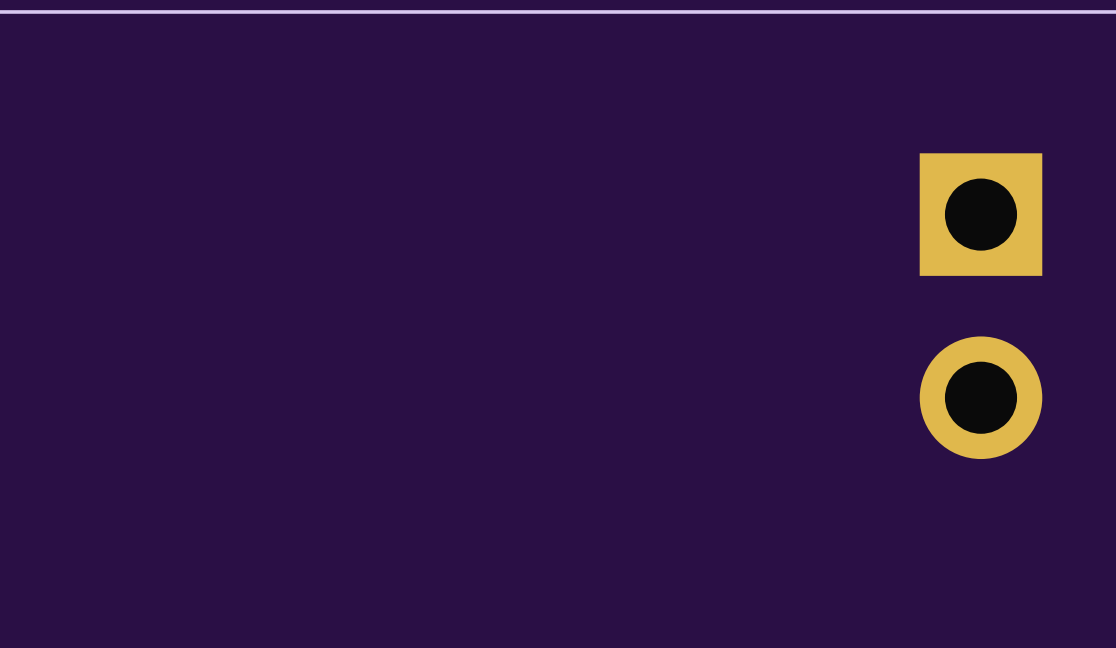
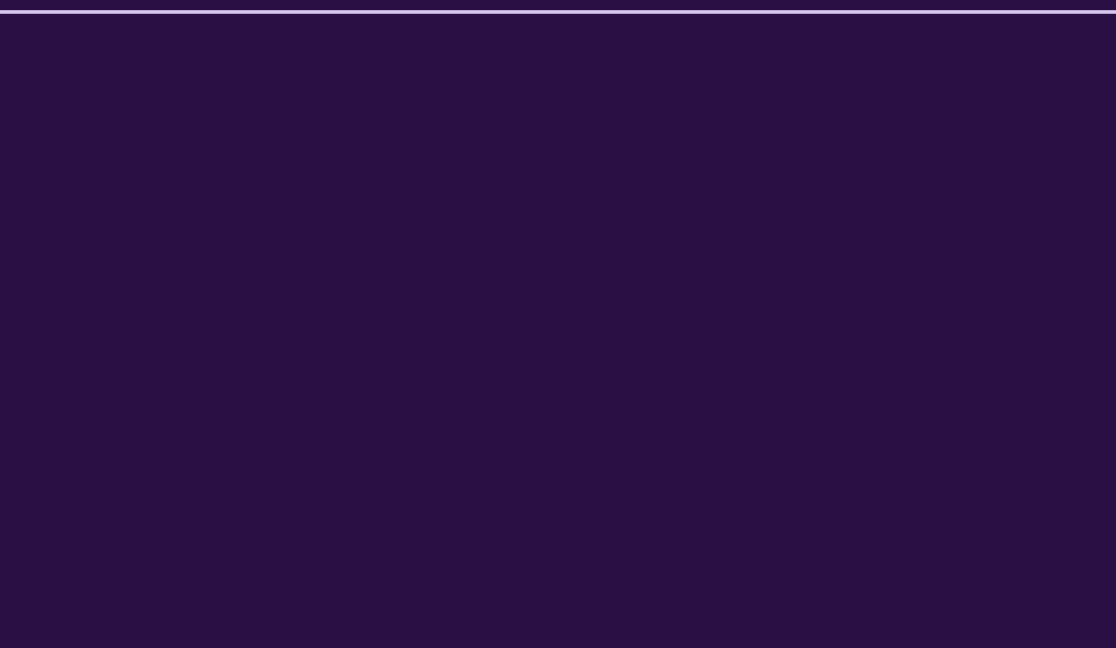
part: (980, 306) -> none

